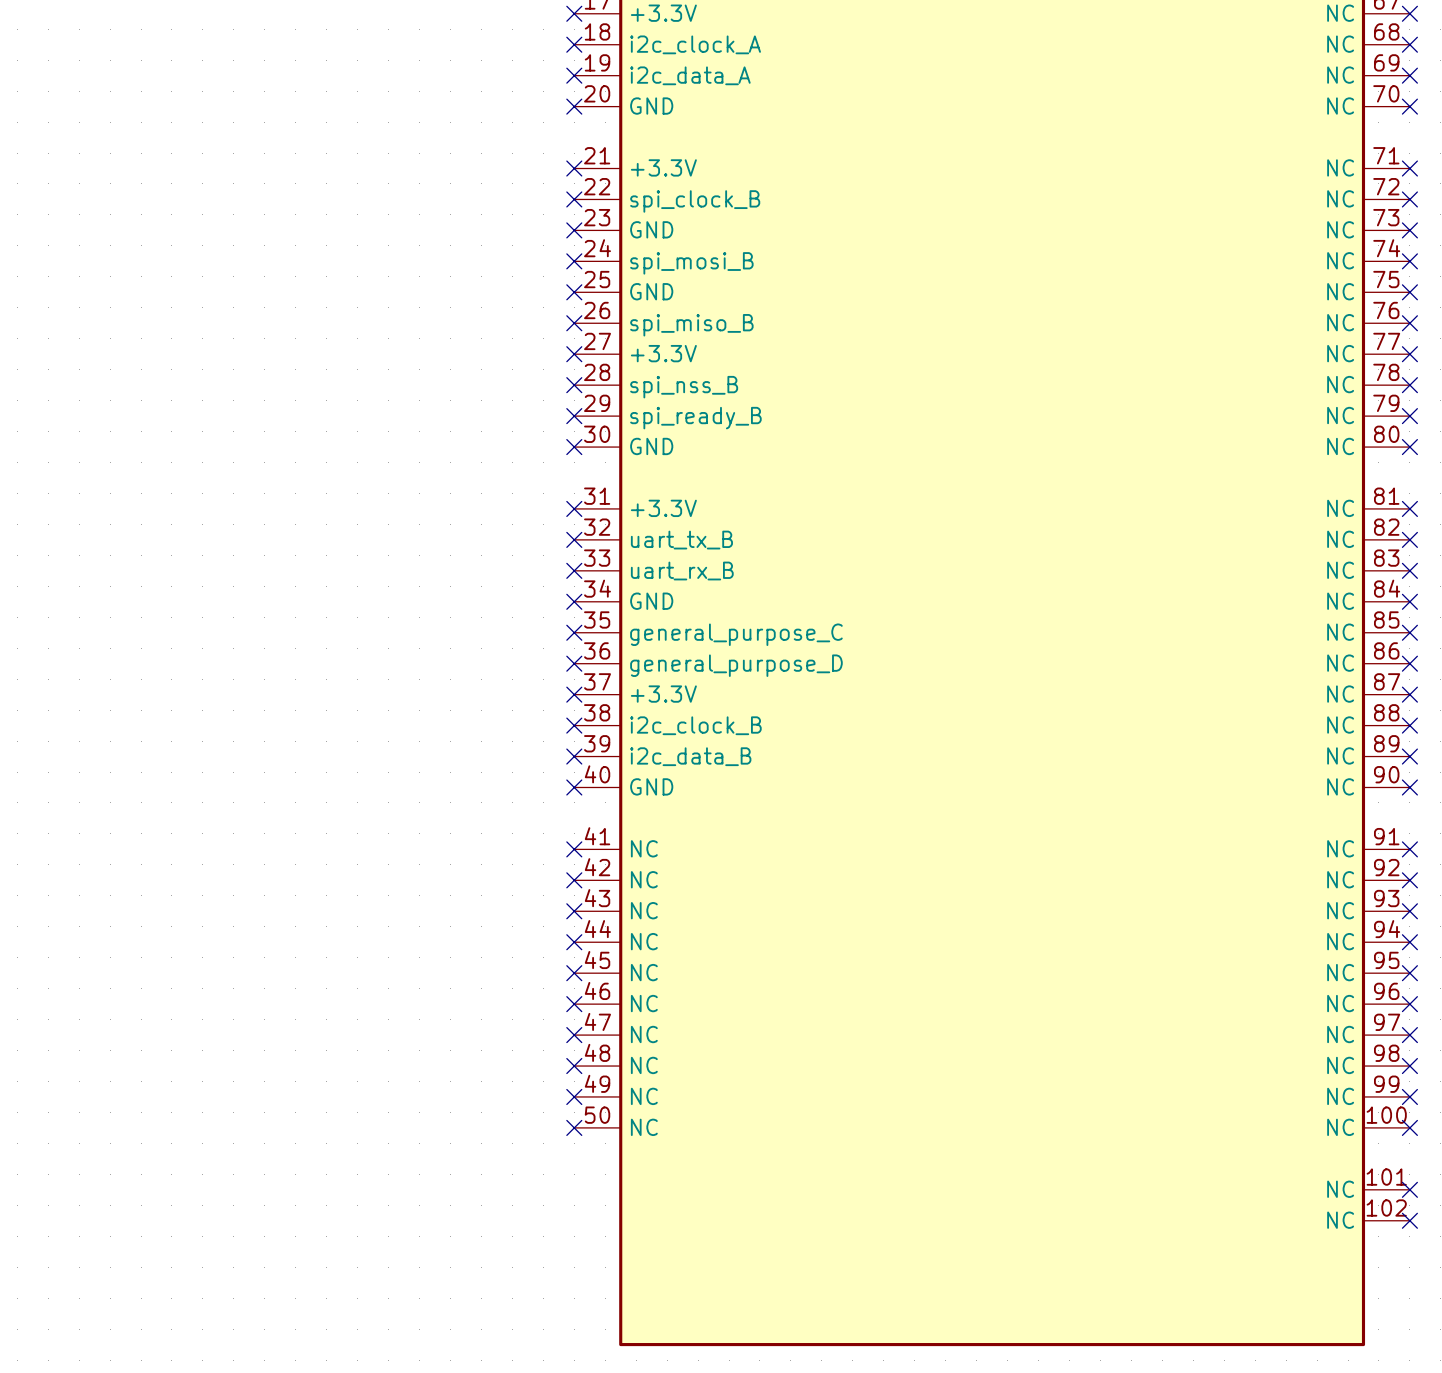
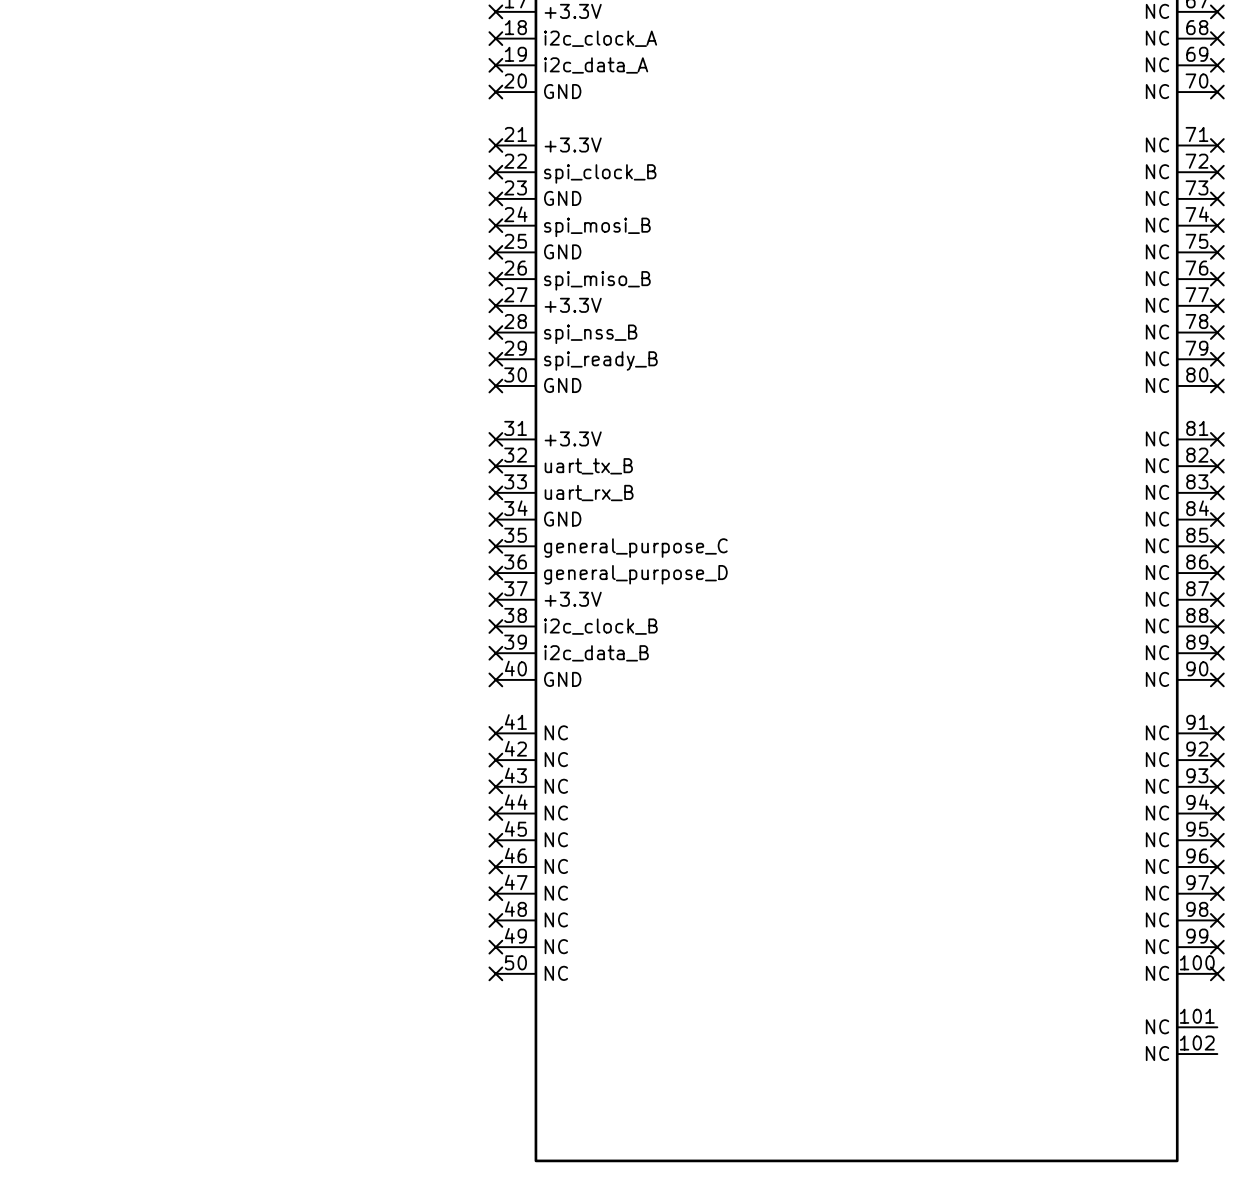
no-connect mark: (1409, 1189) -> none
no-connect mark: (1409, 1220) -> none

